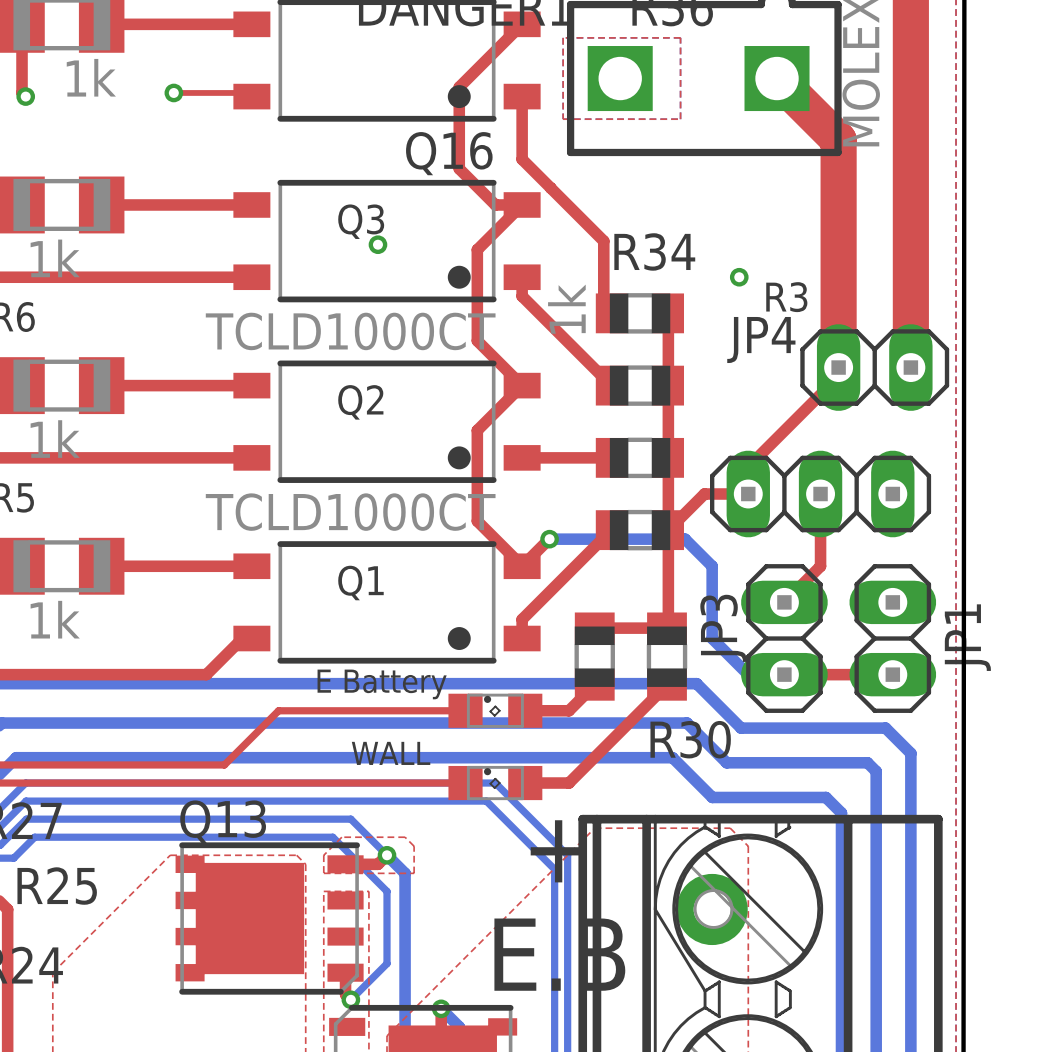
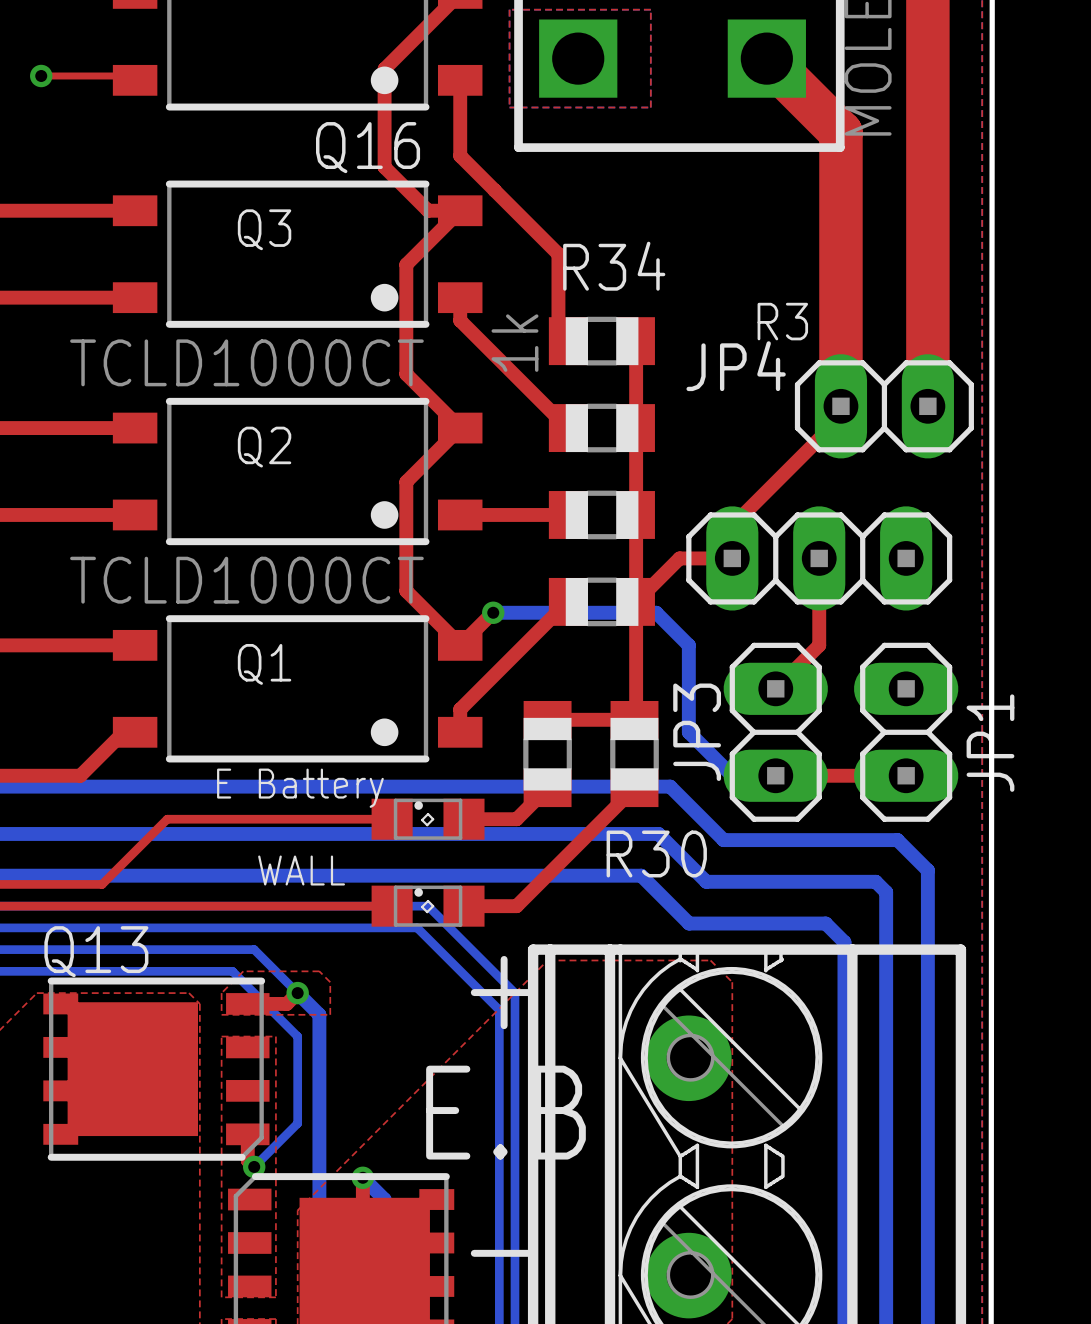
via: (377, 244) -> none
via: (739, 277) -> none

